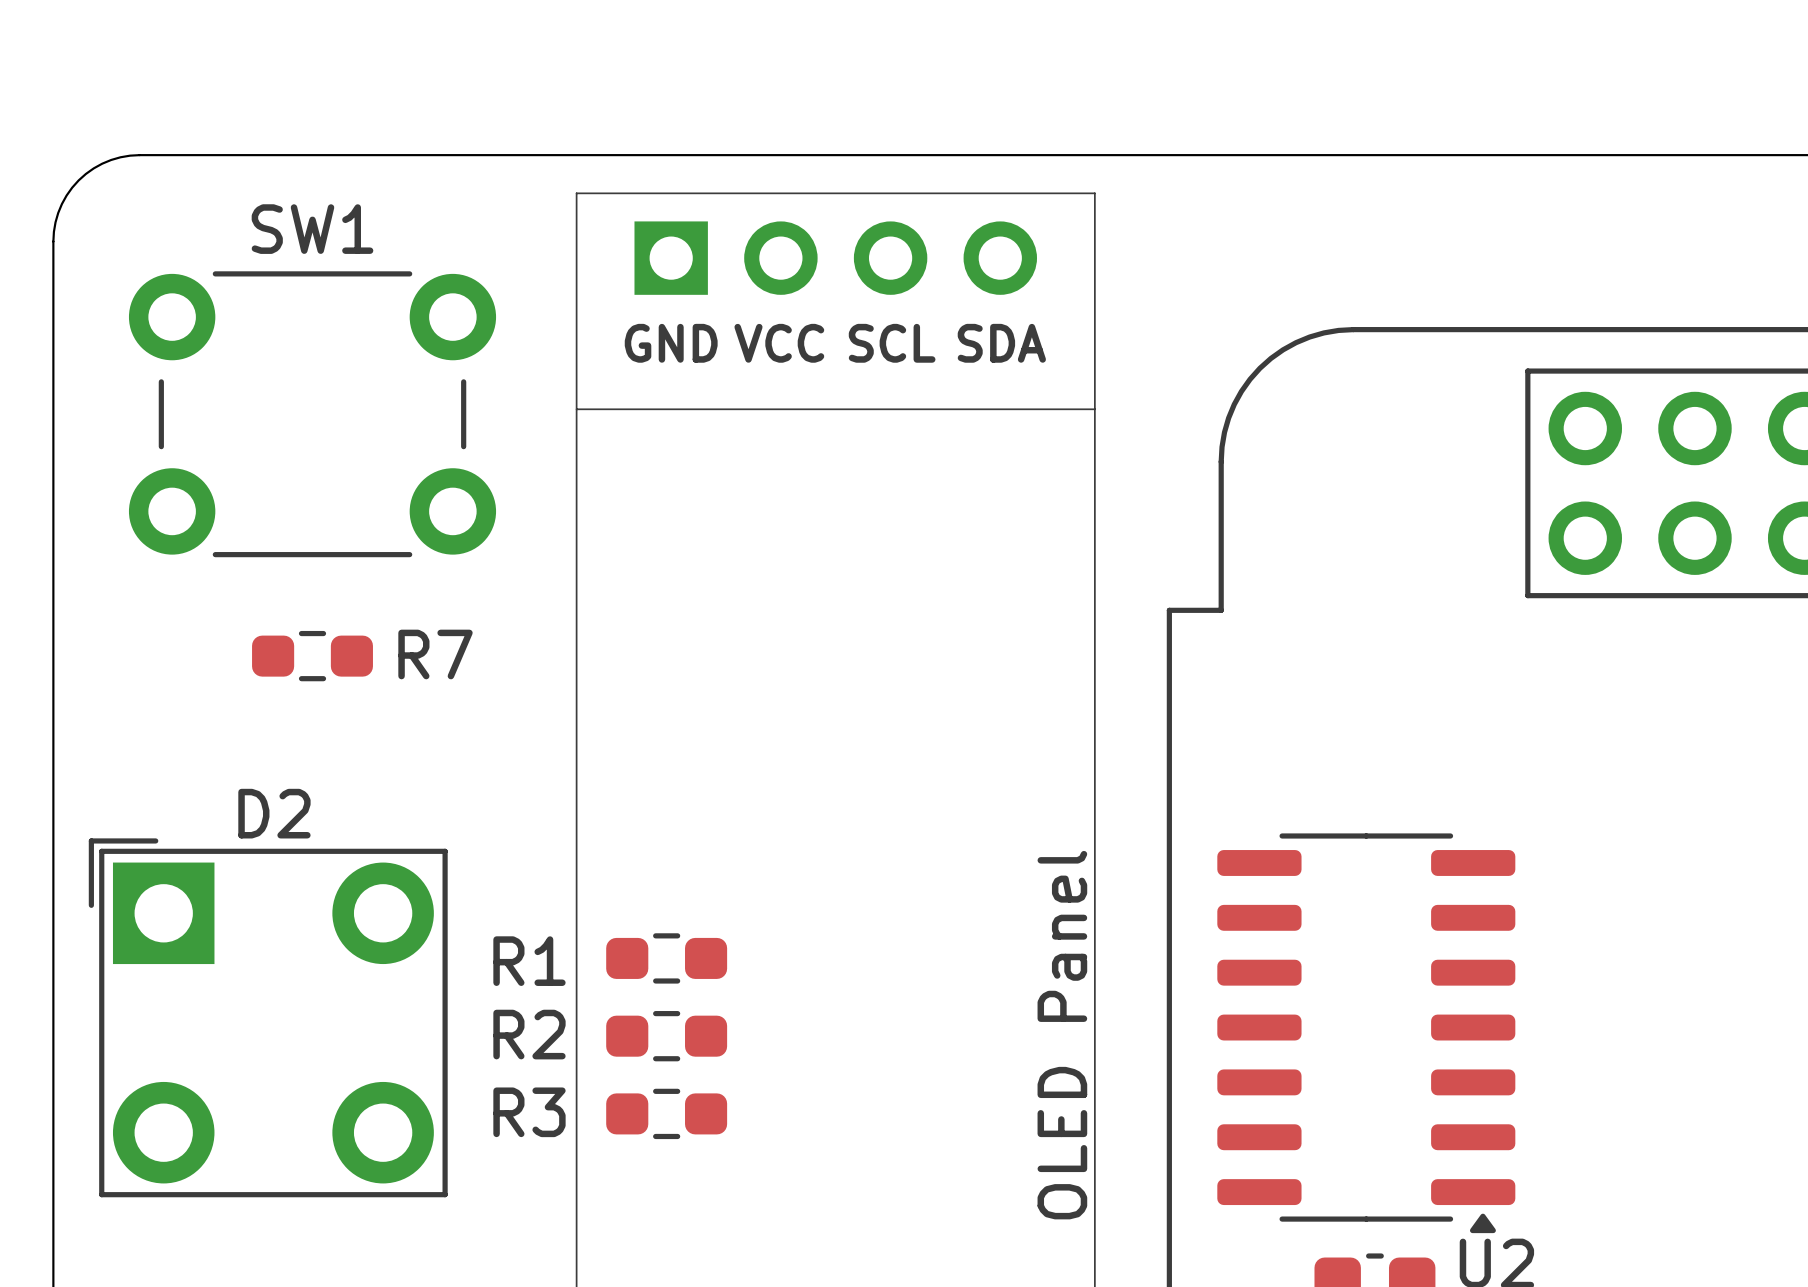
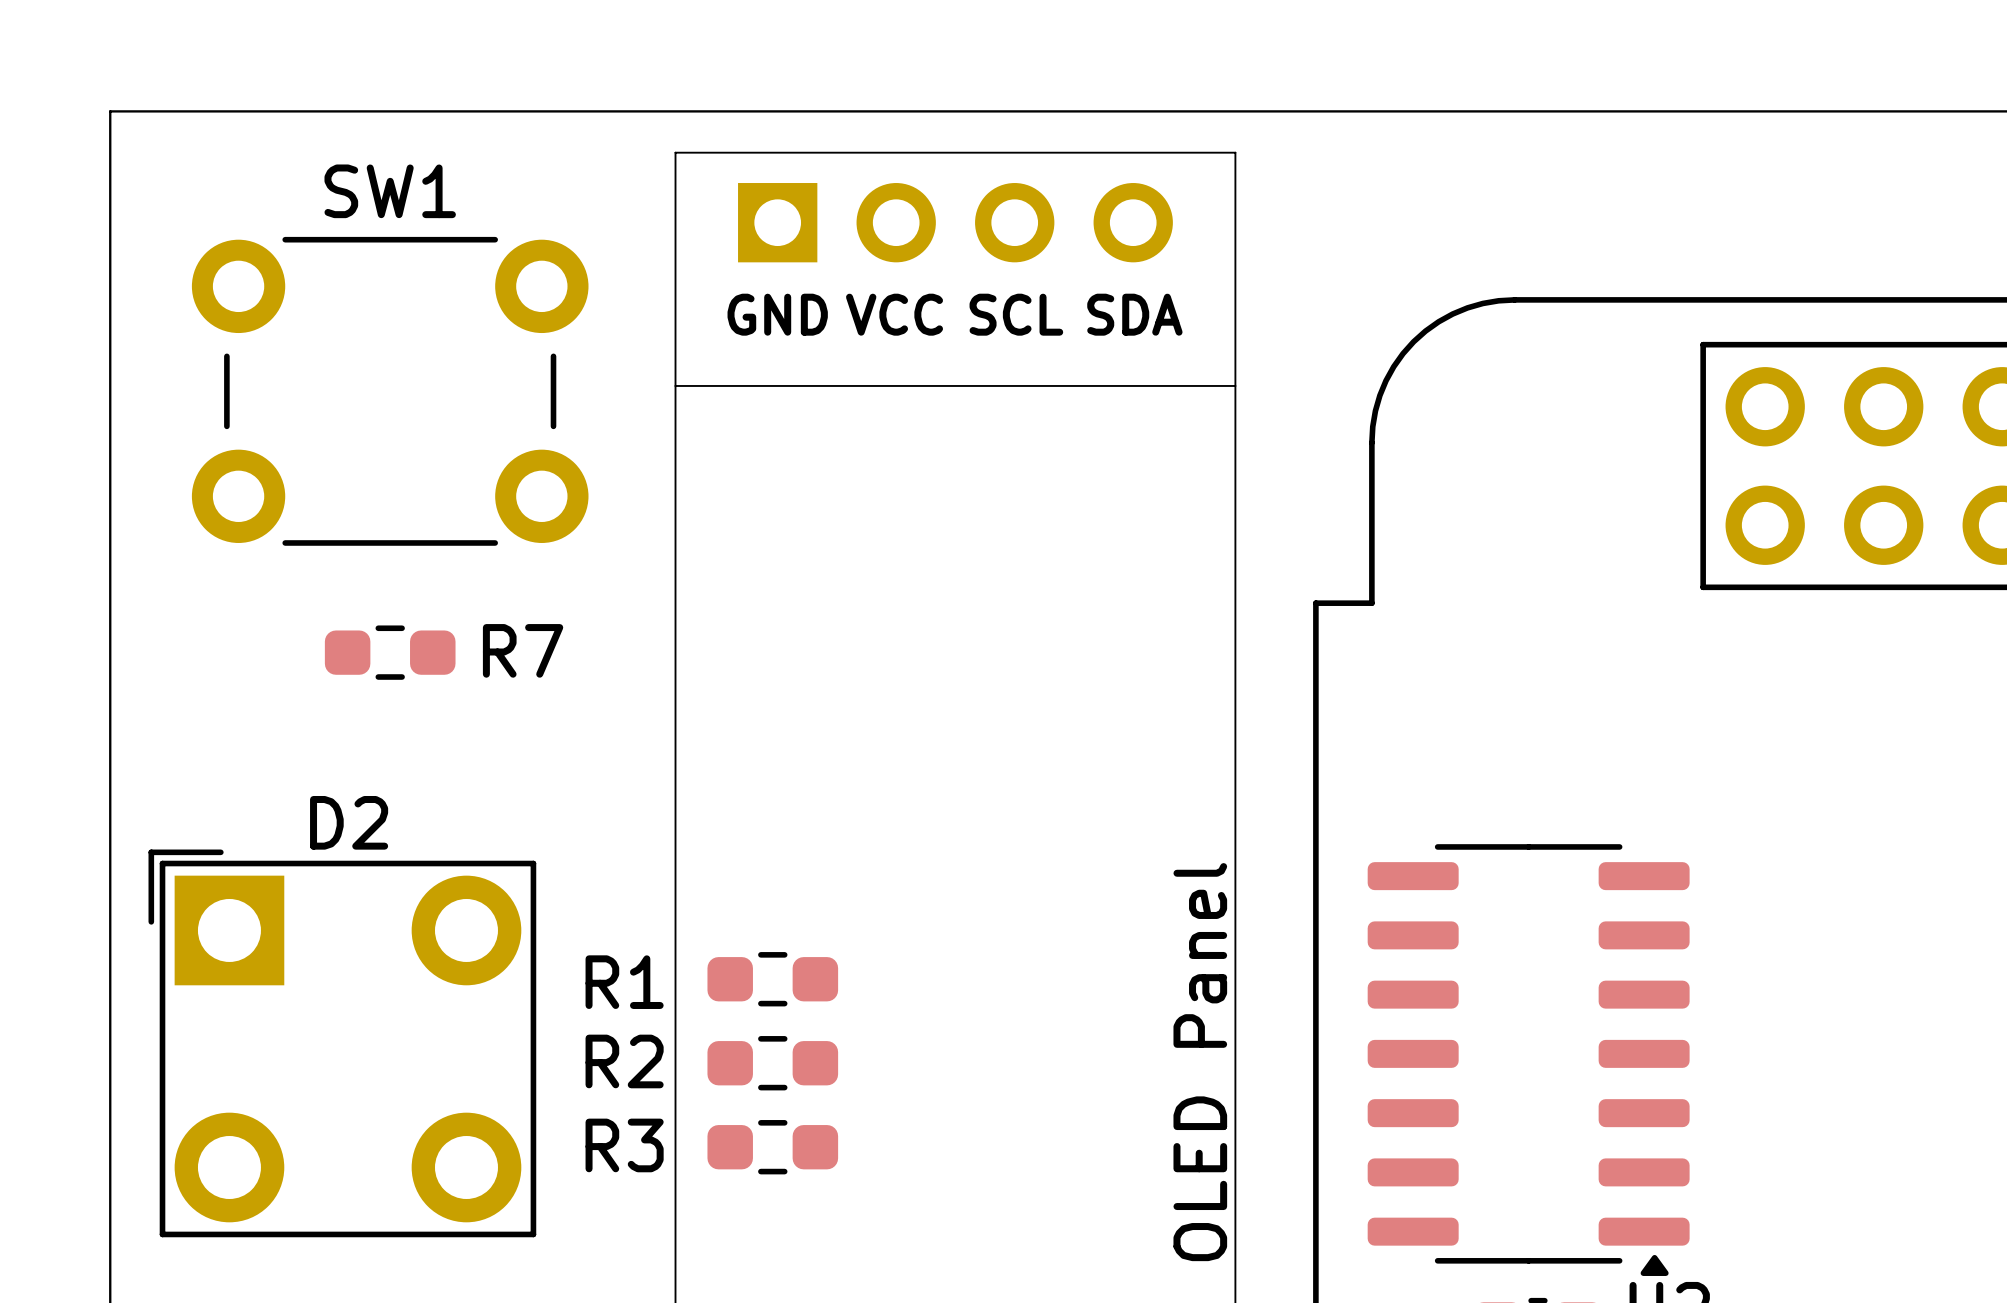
board edge: (139, 155) (120, 157) (102, 163) (78, 180) (61, 204) (55, 222) (53, 241) -> (203, 111) (110, 111) (110, 204)

